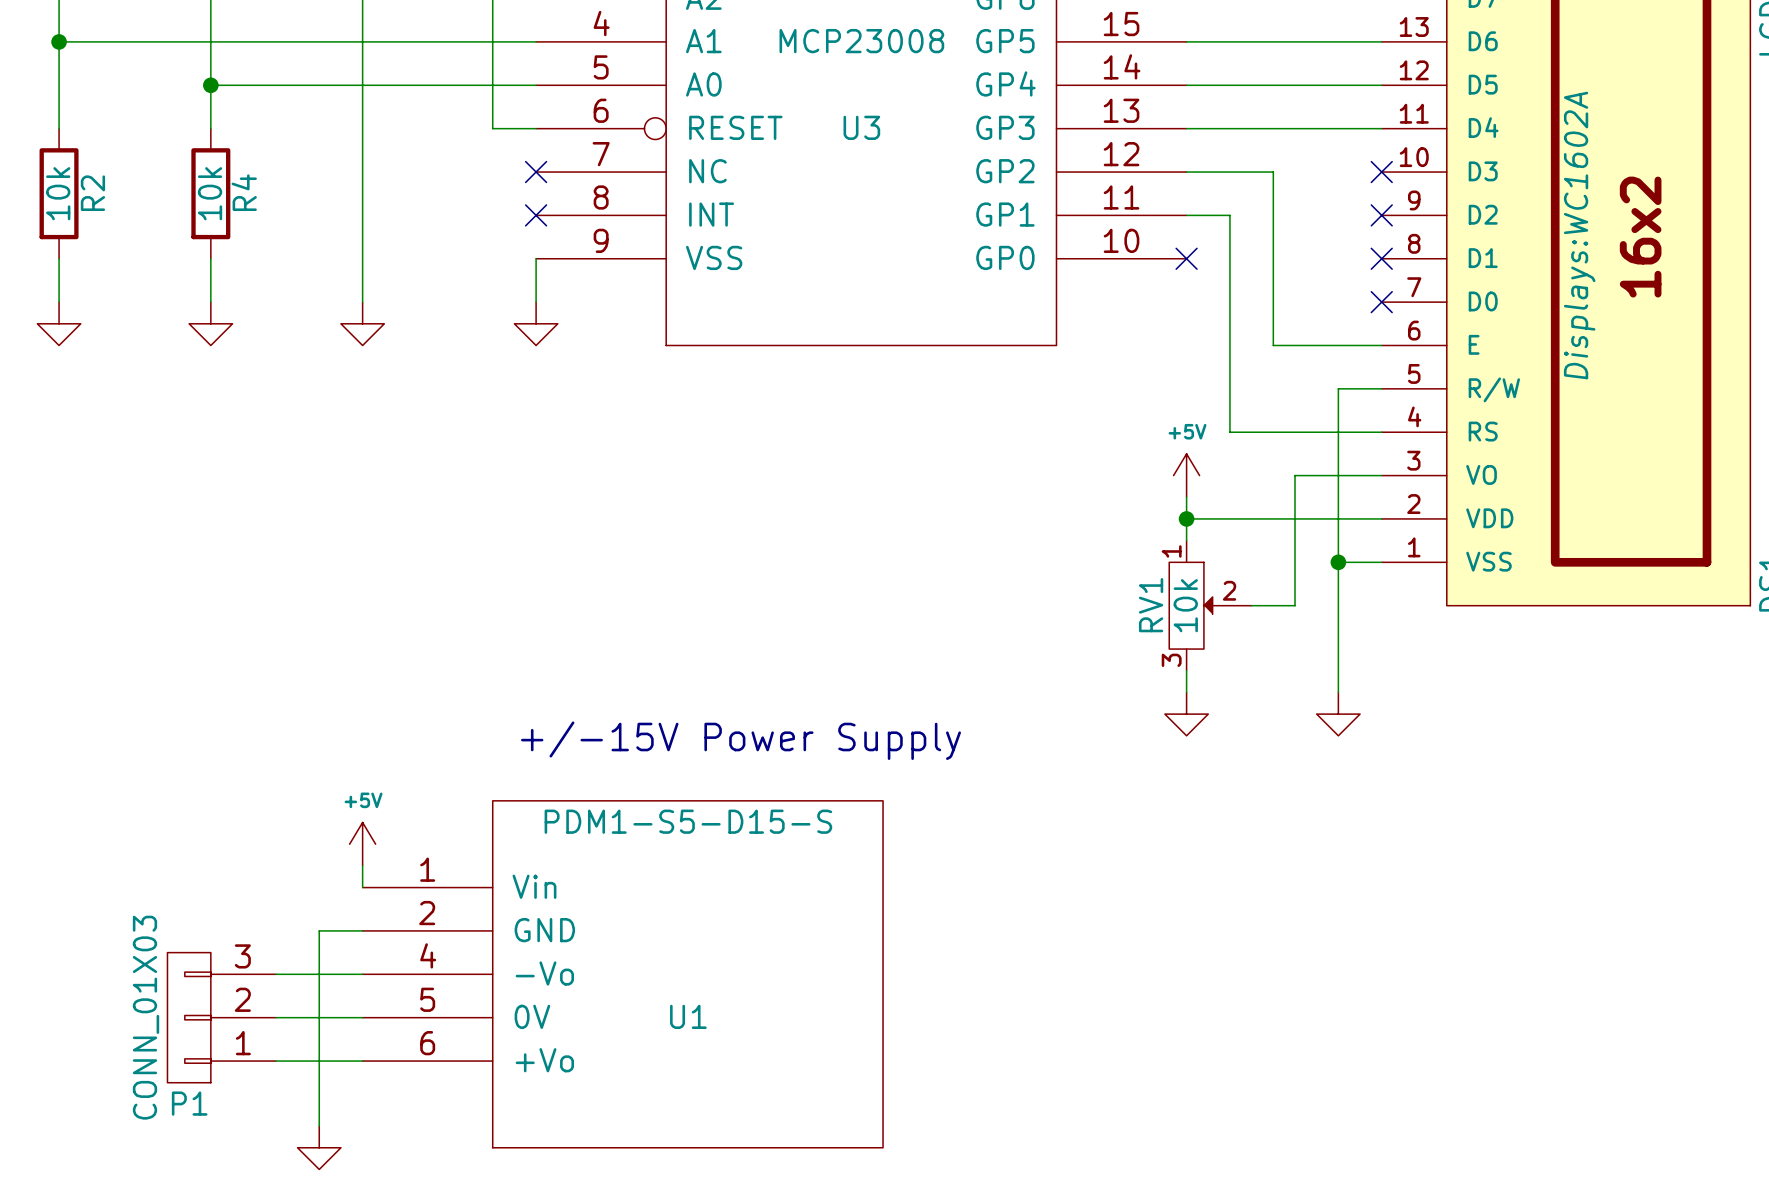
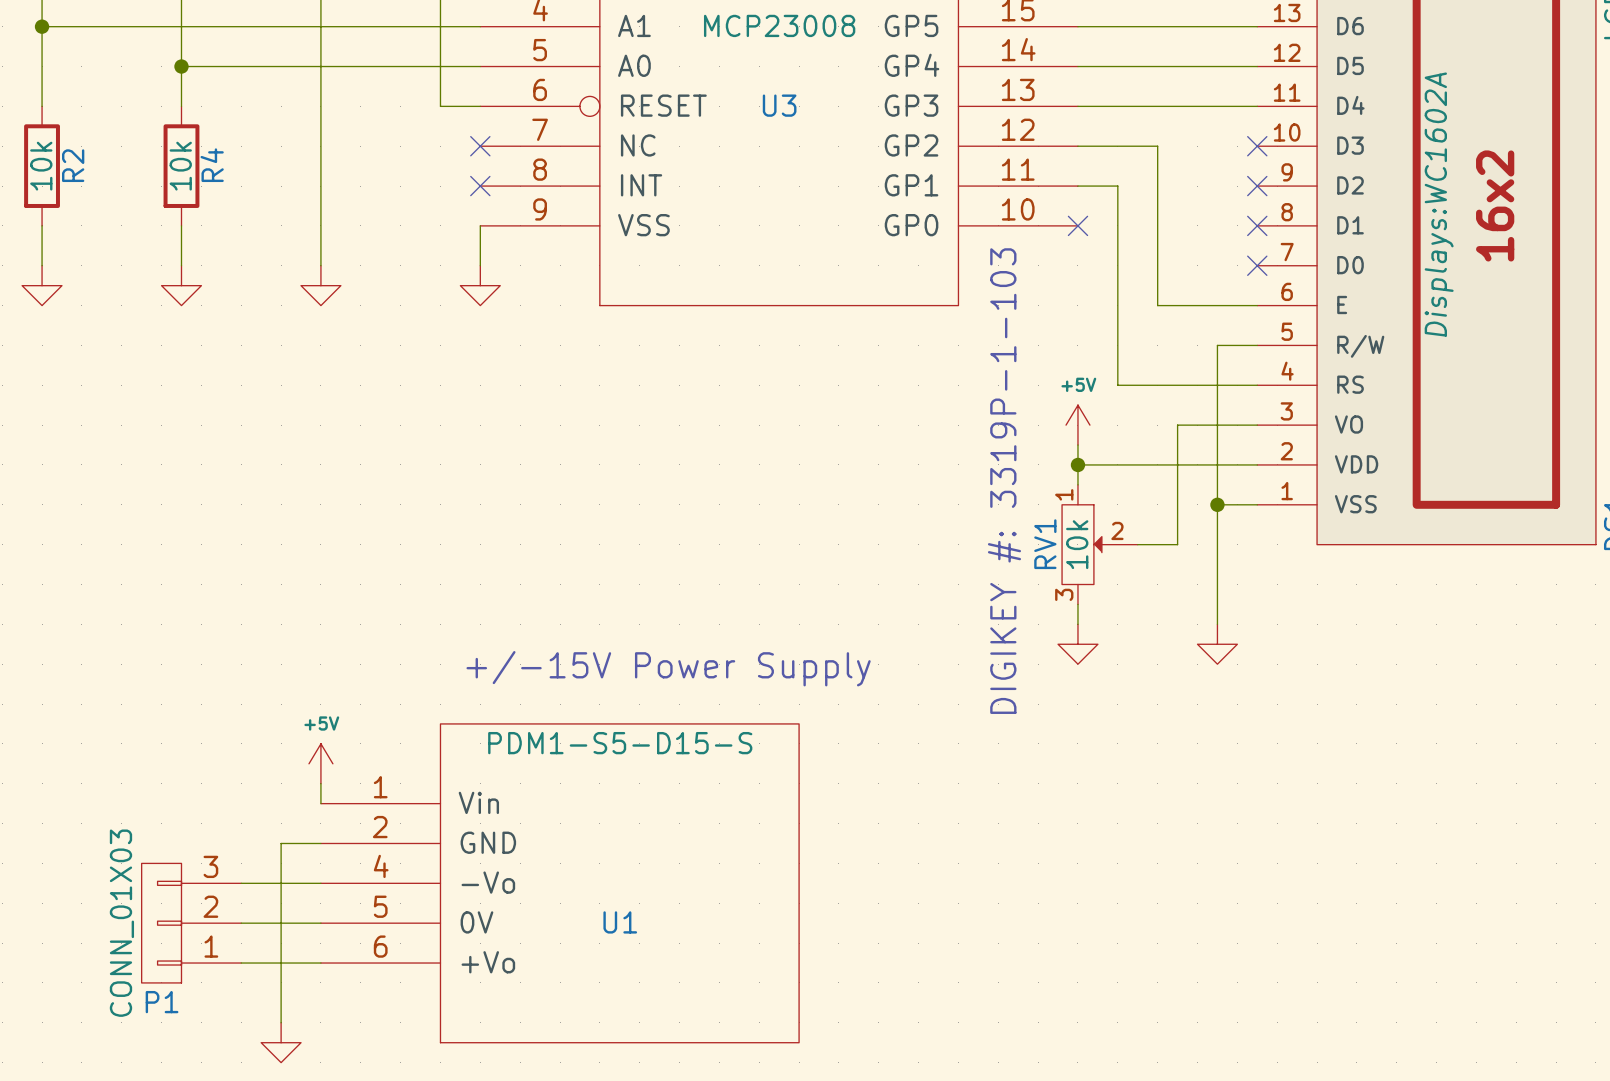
text: none -> DIGIKEY #: 3319P-1-103 (1004, 481)

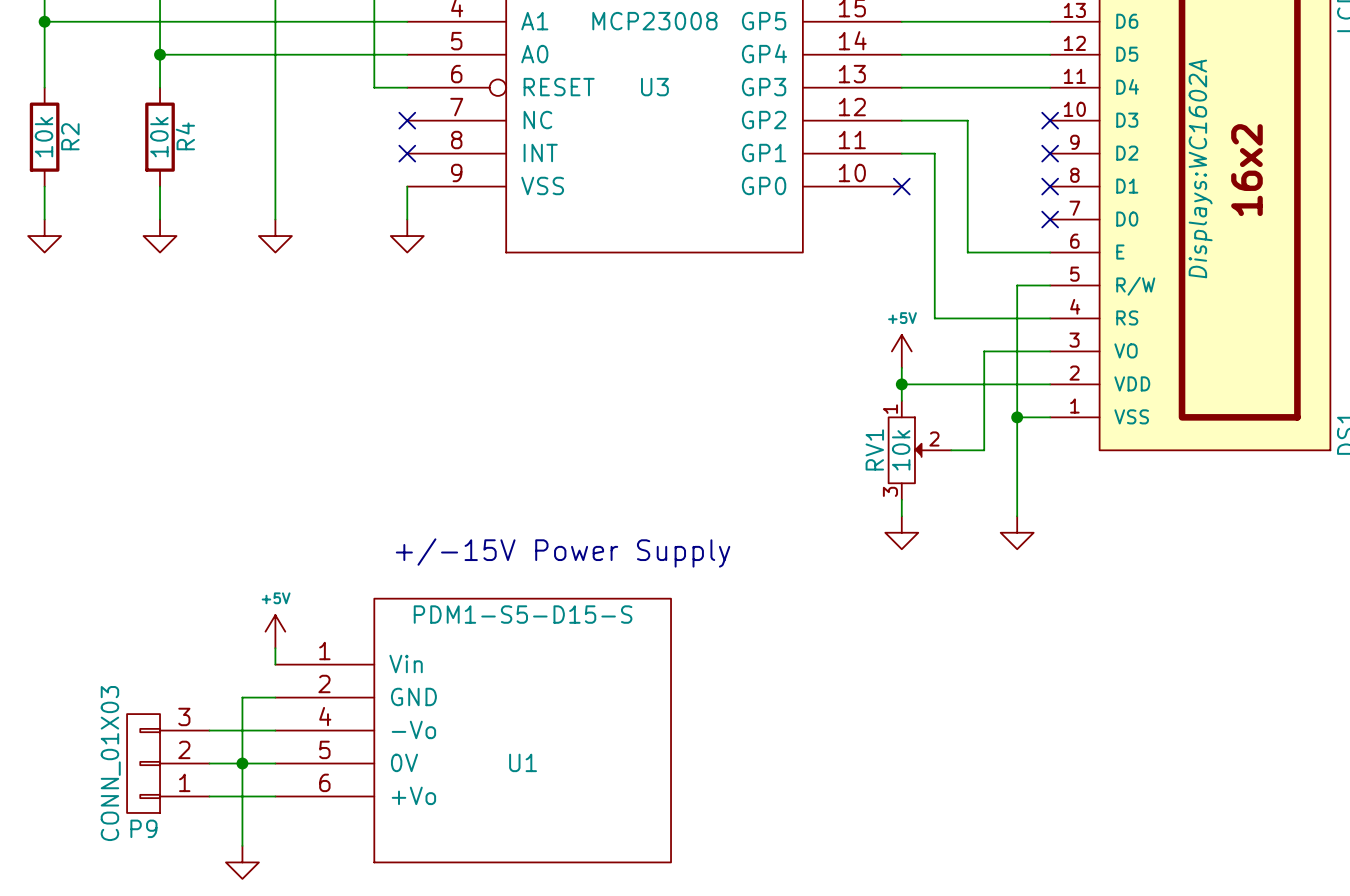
text: DIGIKEY #: 3319P-1-103 (1004, 481) -> none
junction: none -> (242, 763)
P1 name: P1 (162, 1002) -> P9 (143, 828)

